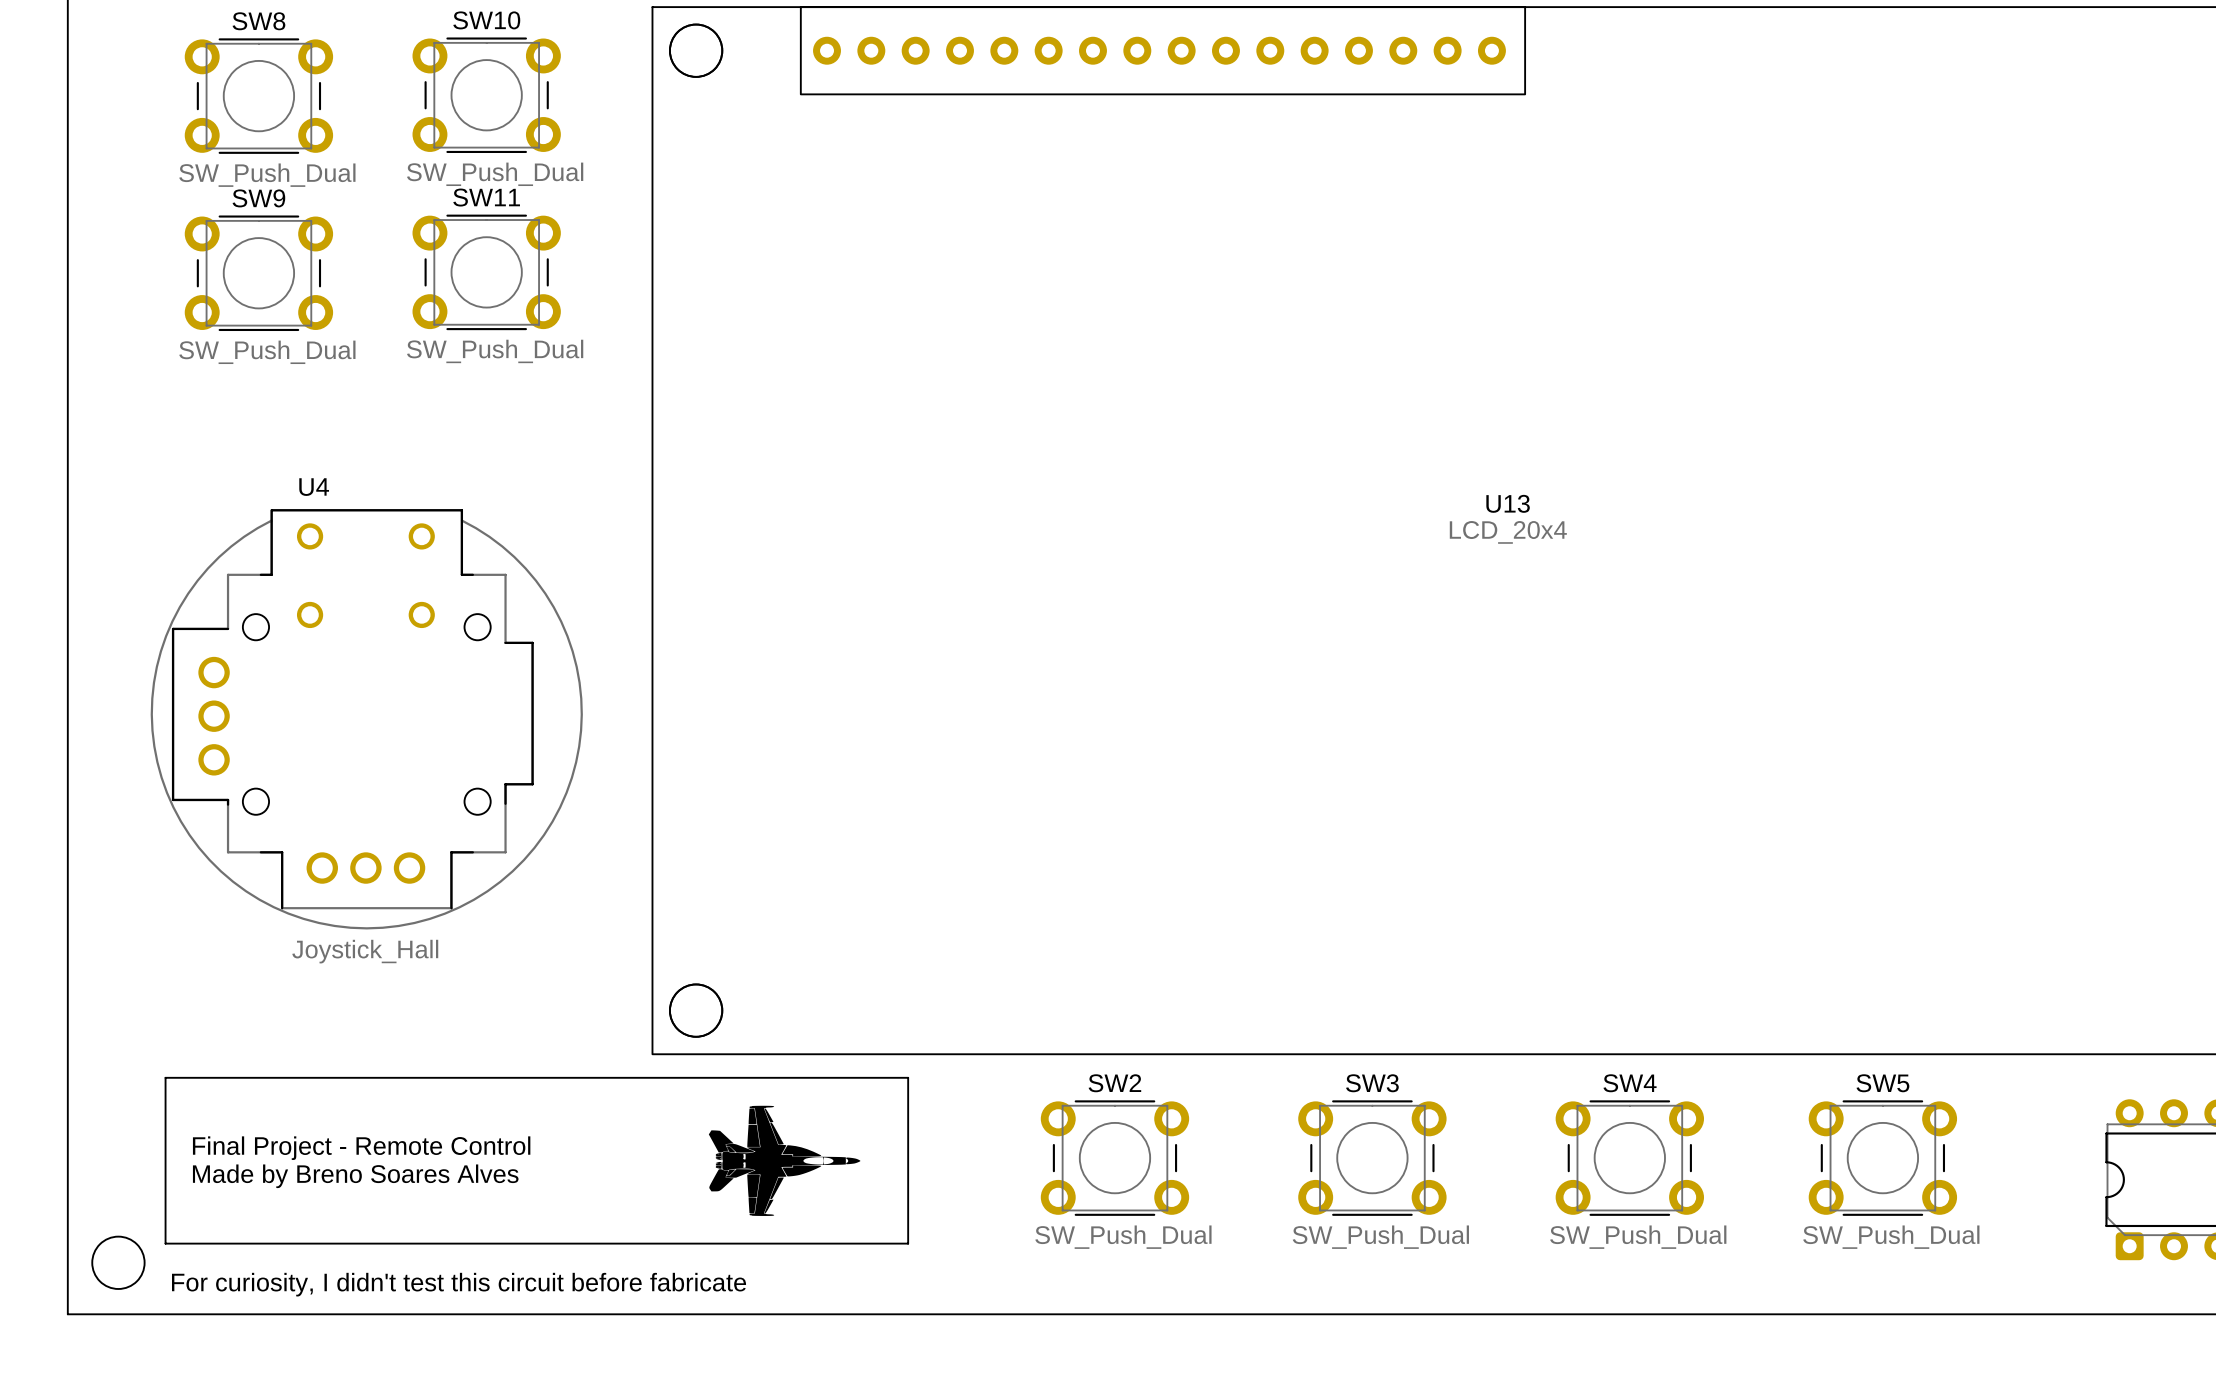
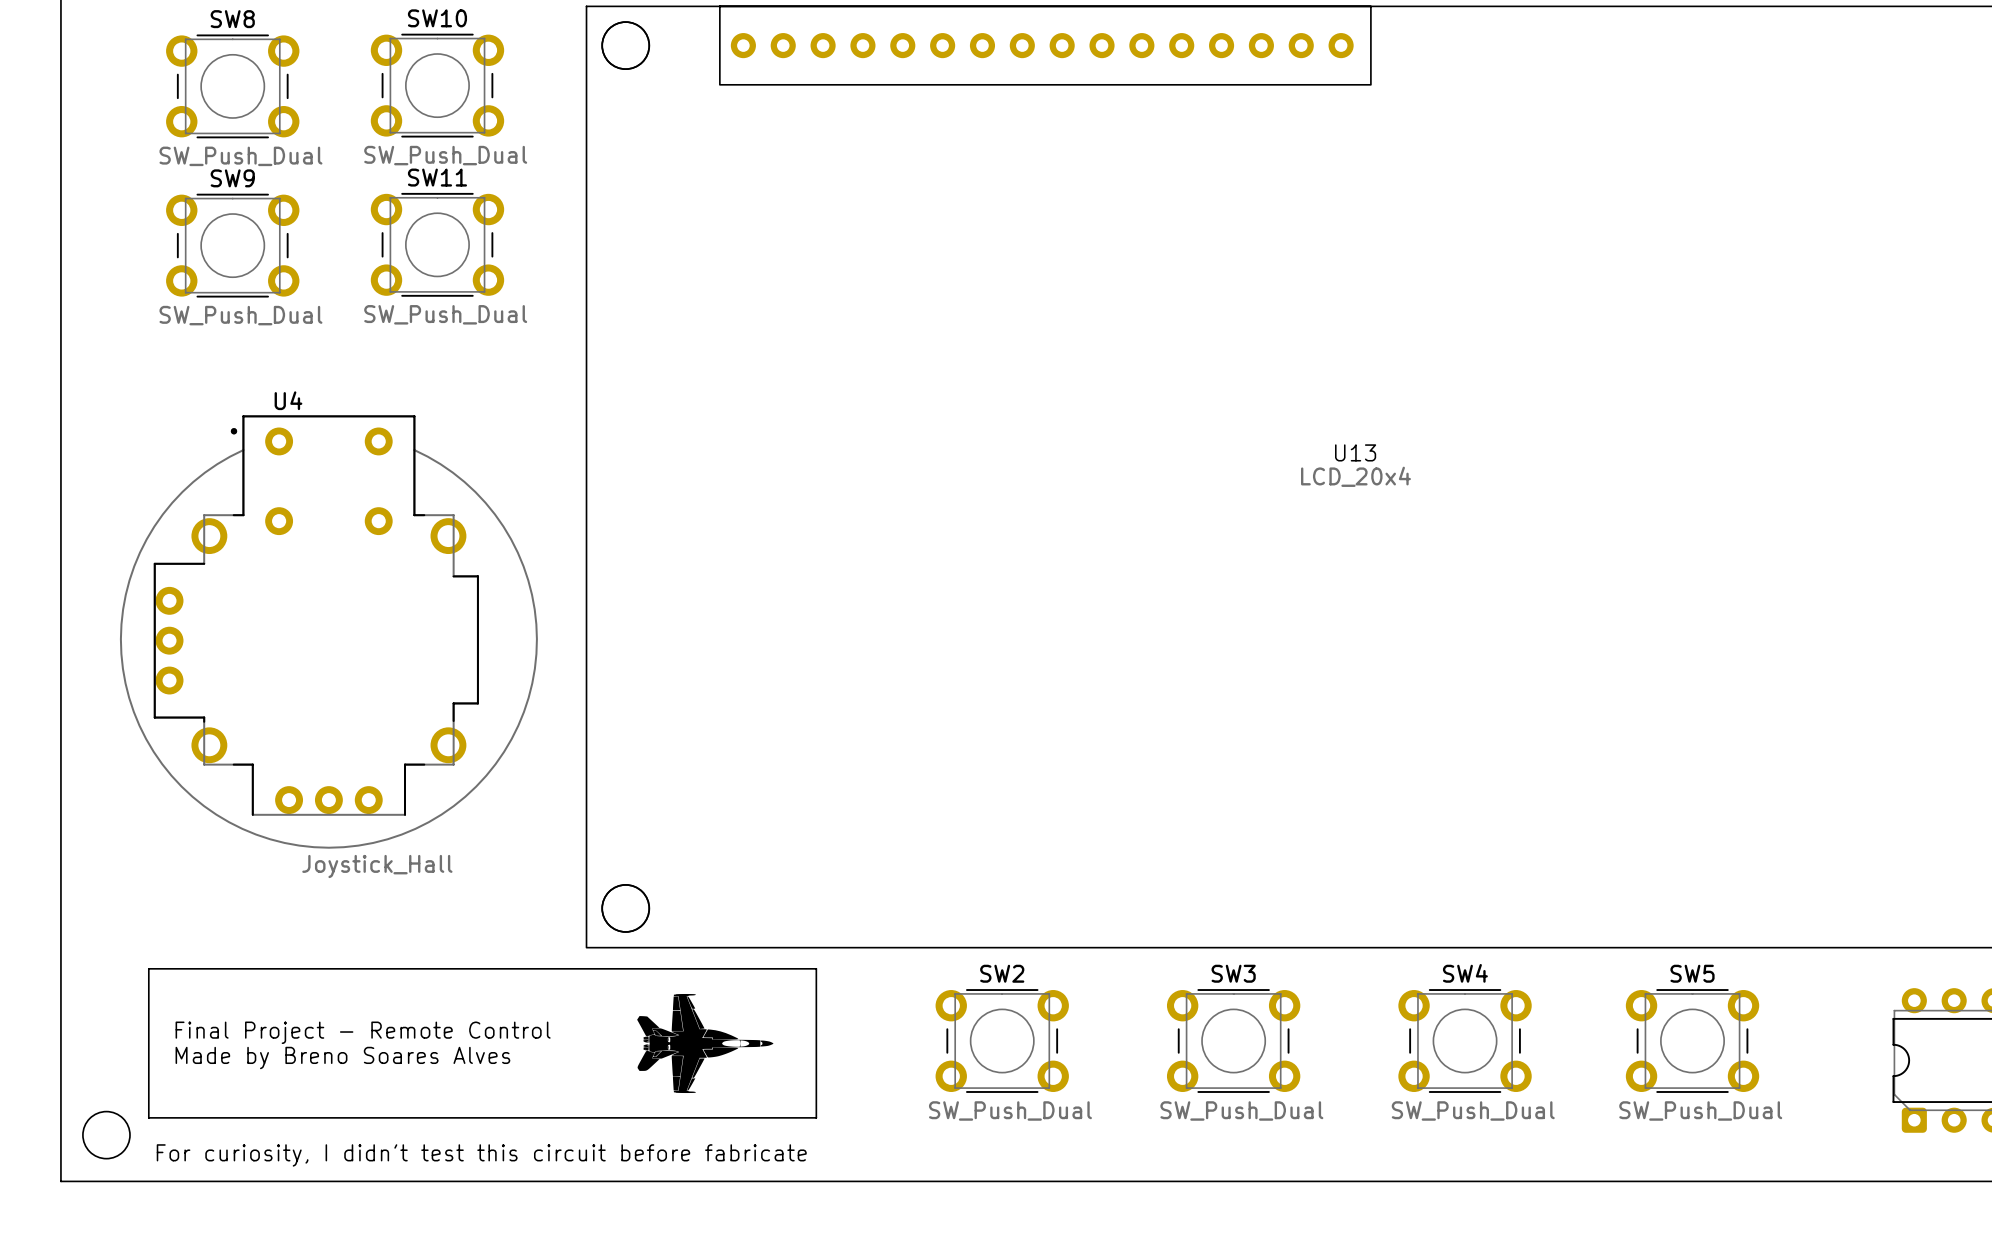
U4 footprint: [150, 509, 583, 930] -> [119, 415, 538, 849]
U4 value position: Joystick_Hall (365, 951) -> Joystick_Hall (377, 866)

